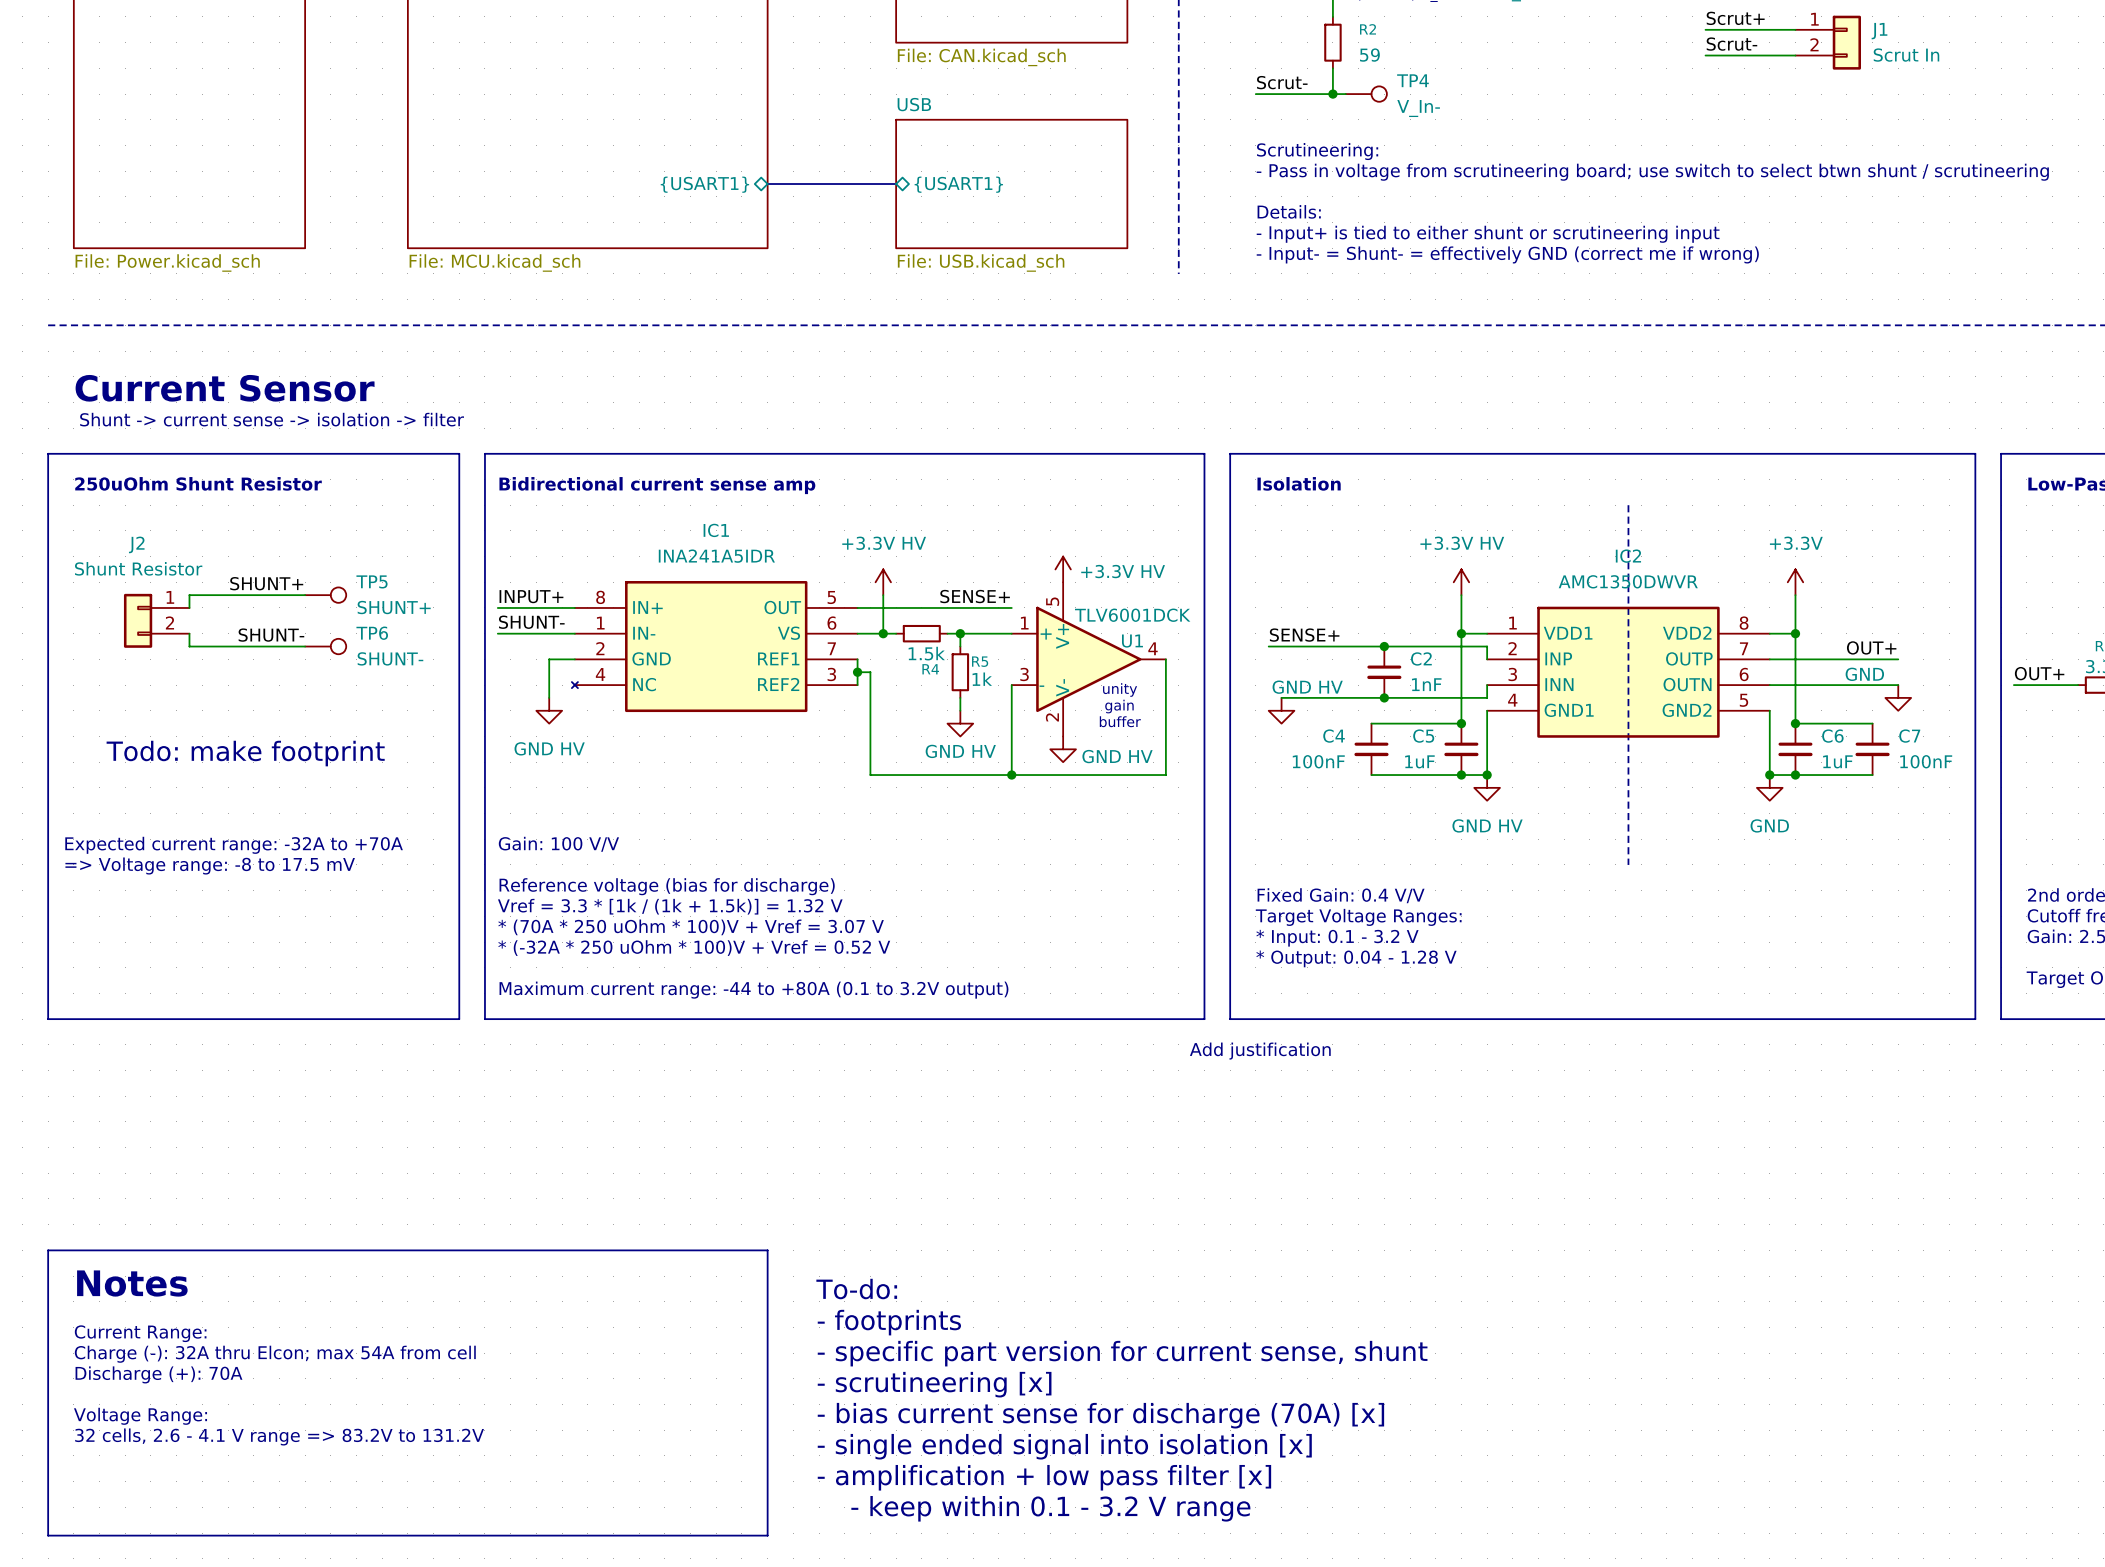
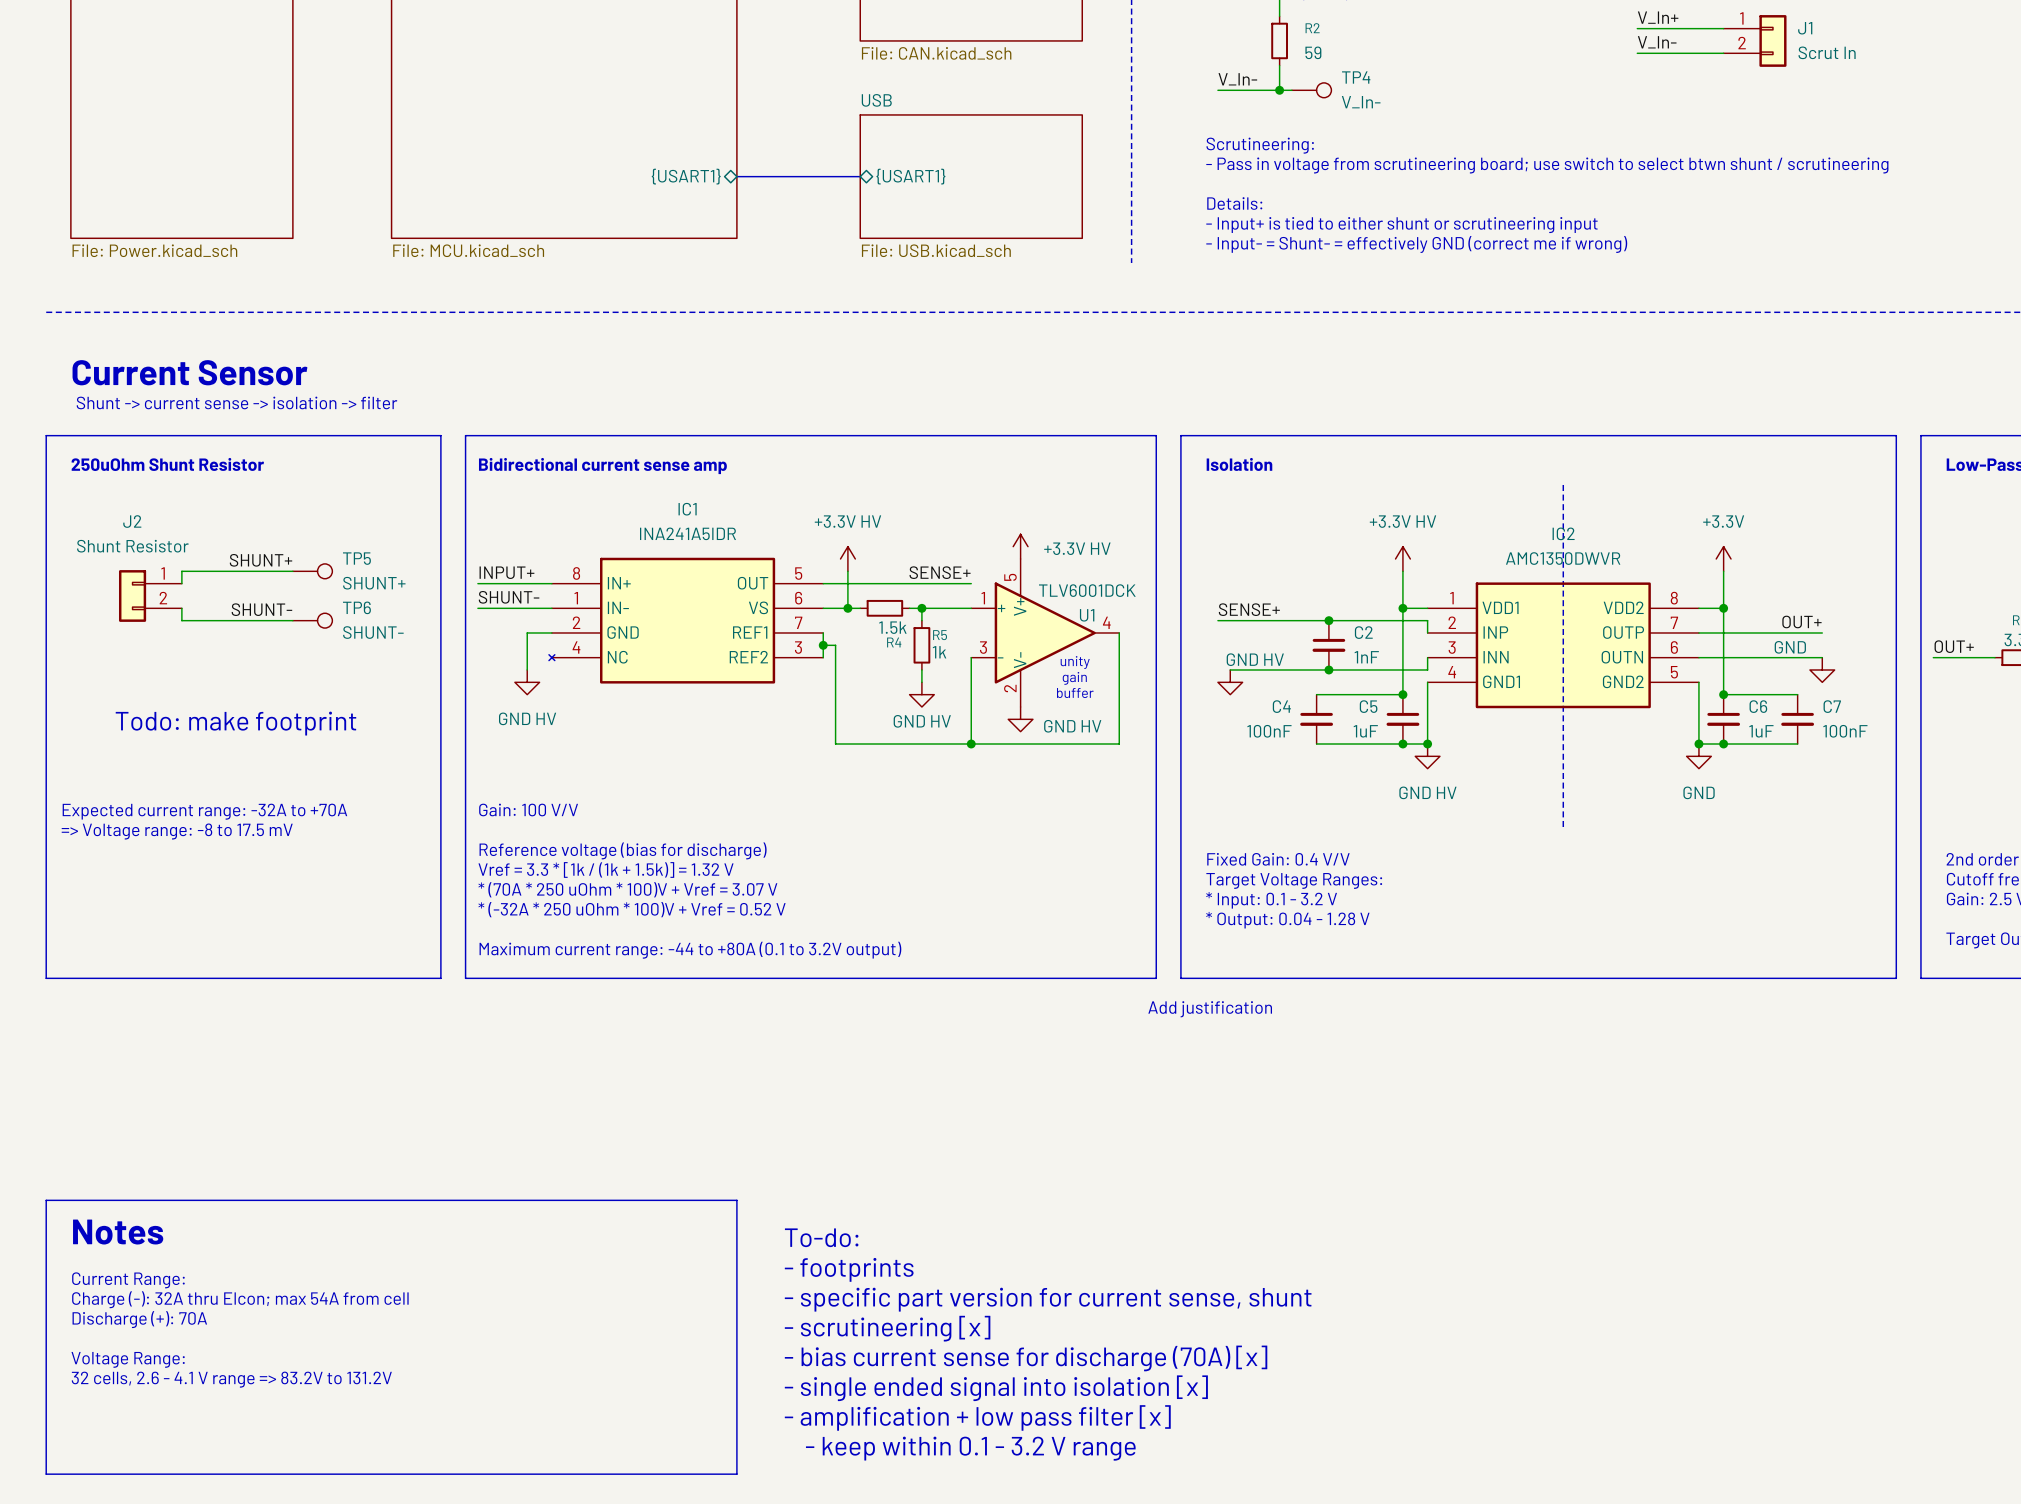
label: Scrut+ (1735, 18) -> V_In+ (1658, 17)
label: Scrut- (1731, 44) -> V_In- (1657, 42)
label: Scrut- (1282, 82) -> none
label: none -> V_In- (1237, 79)
wire: (1255, 94) (1268, 94) -> none

